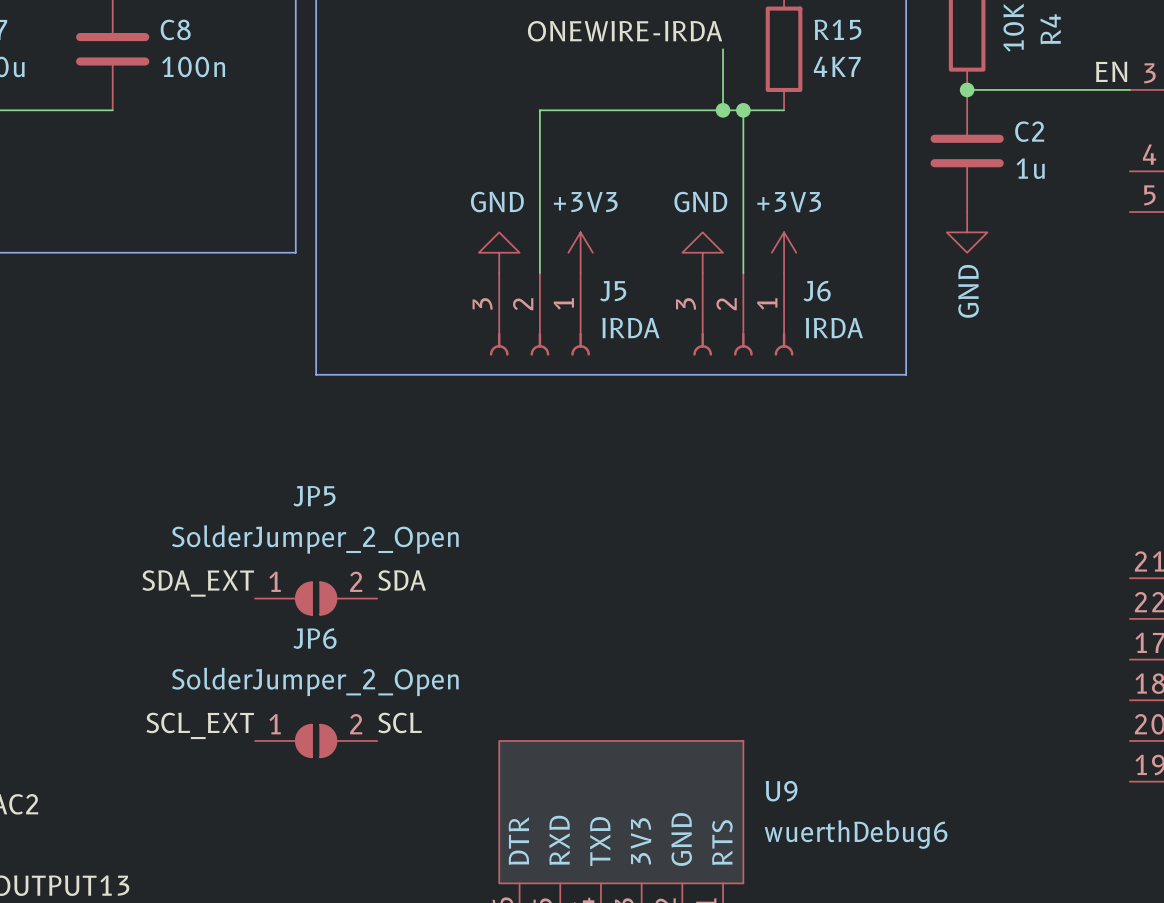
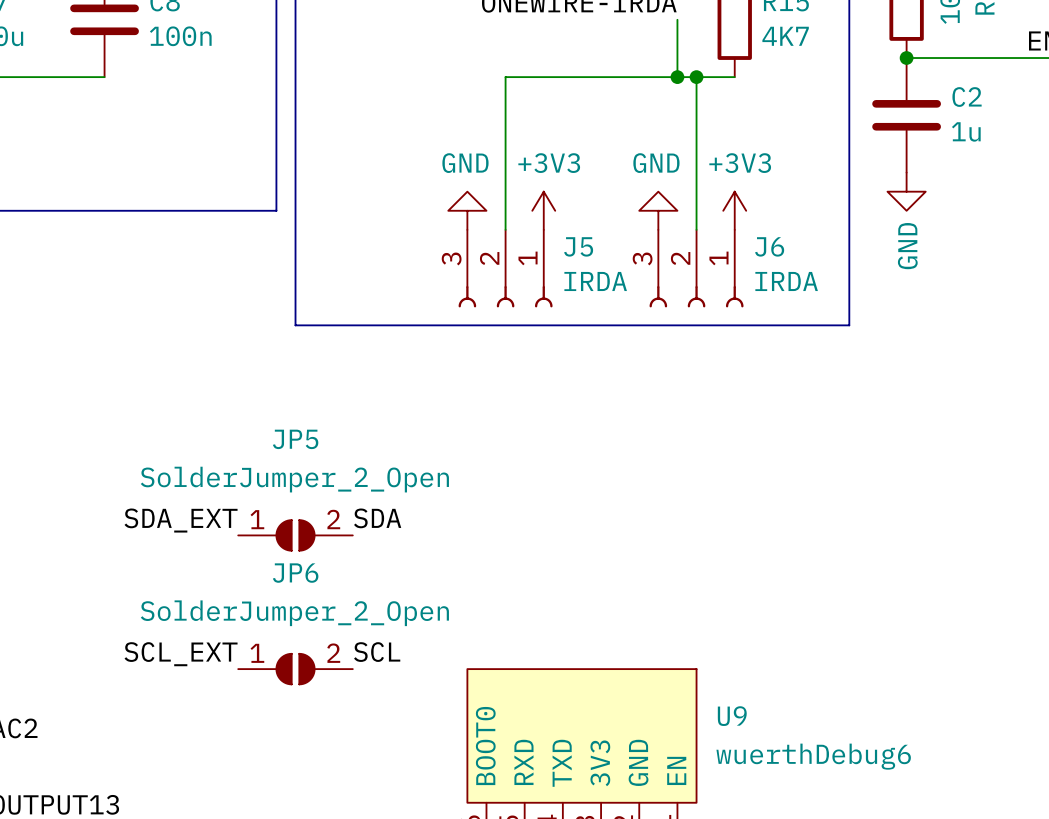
U9 pin name: DTR (518, 840) -> BOOT0 (485, 746)
U9 pin name: RTS (722, 842) -> EN (676, 770)

